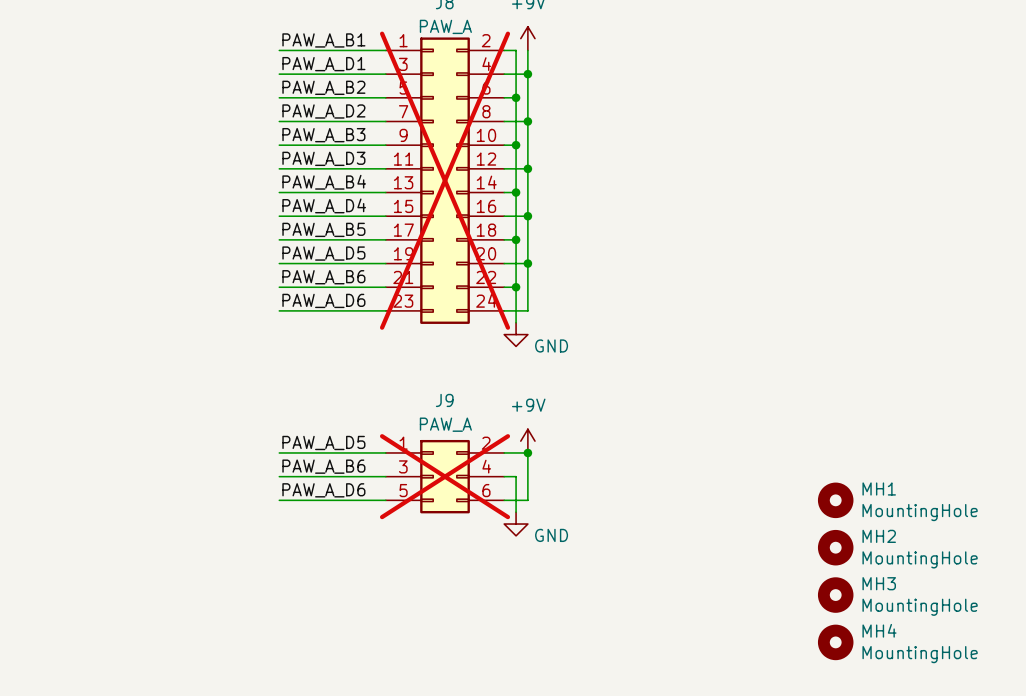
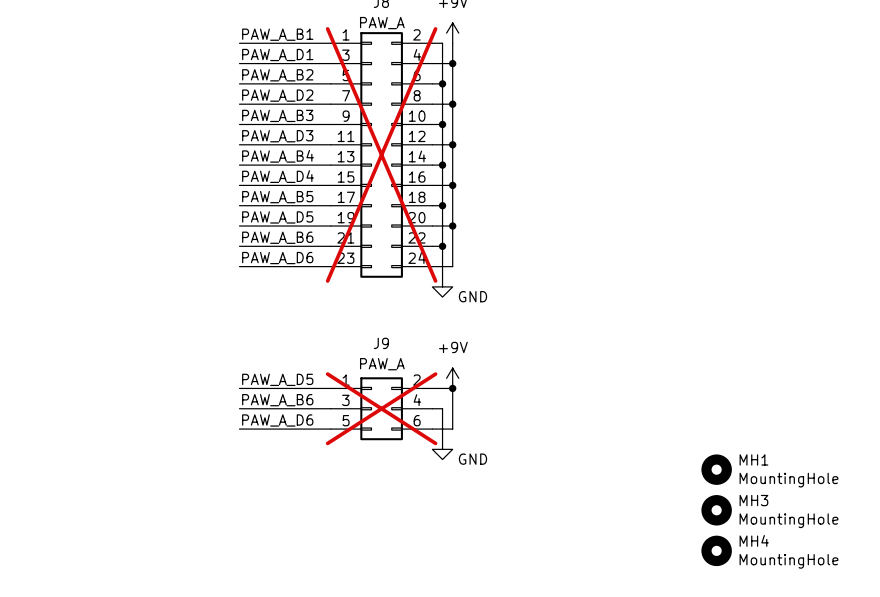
MH1: MountingHole (835, 500) -> none
MH2 name: MH2 (879, 536) -> MH1 (753, 459)

